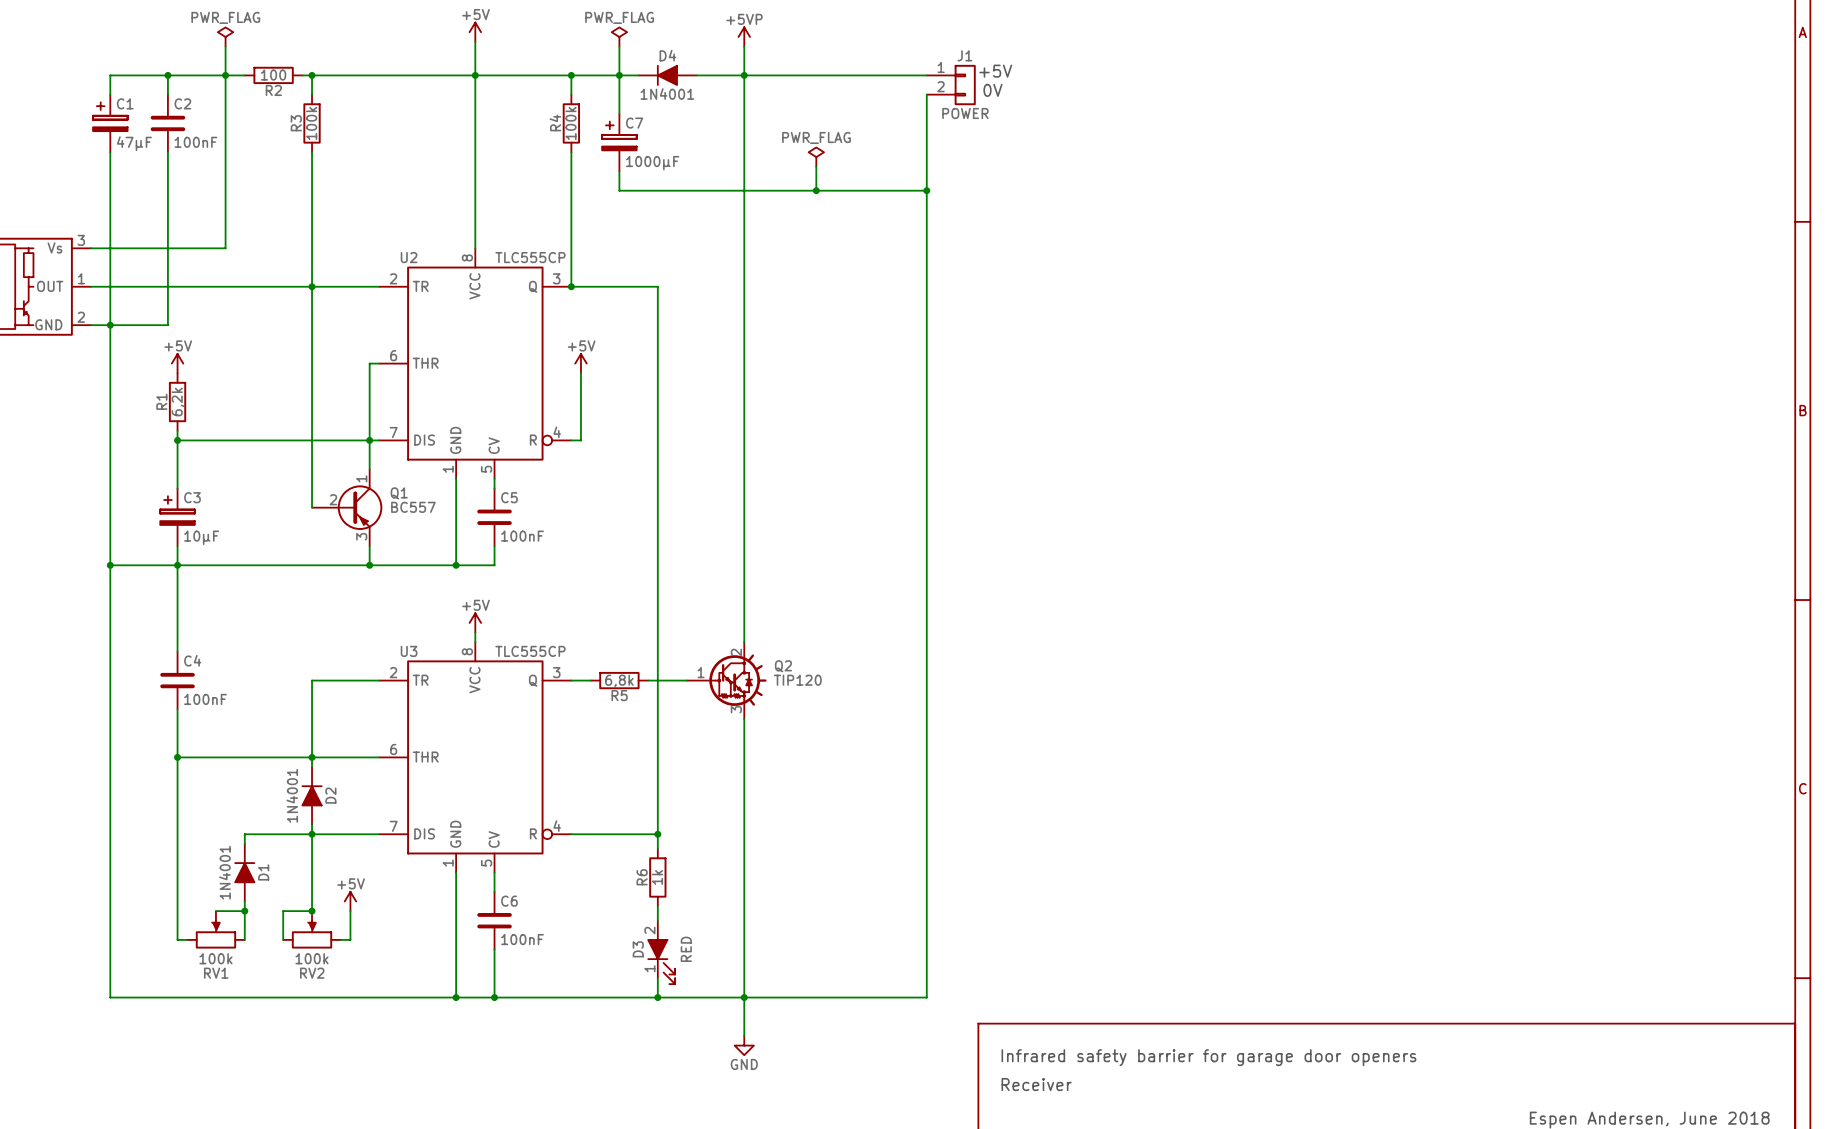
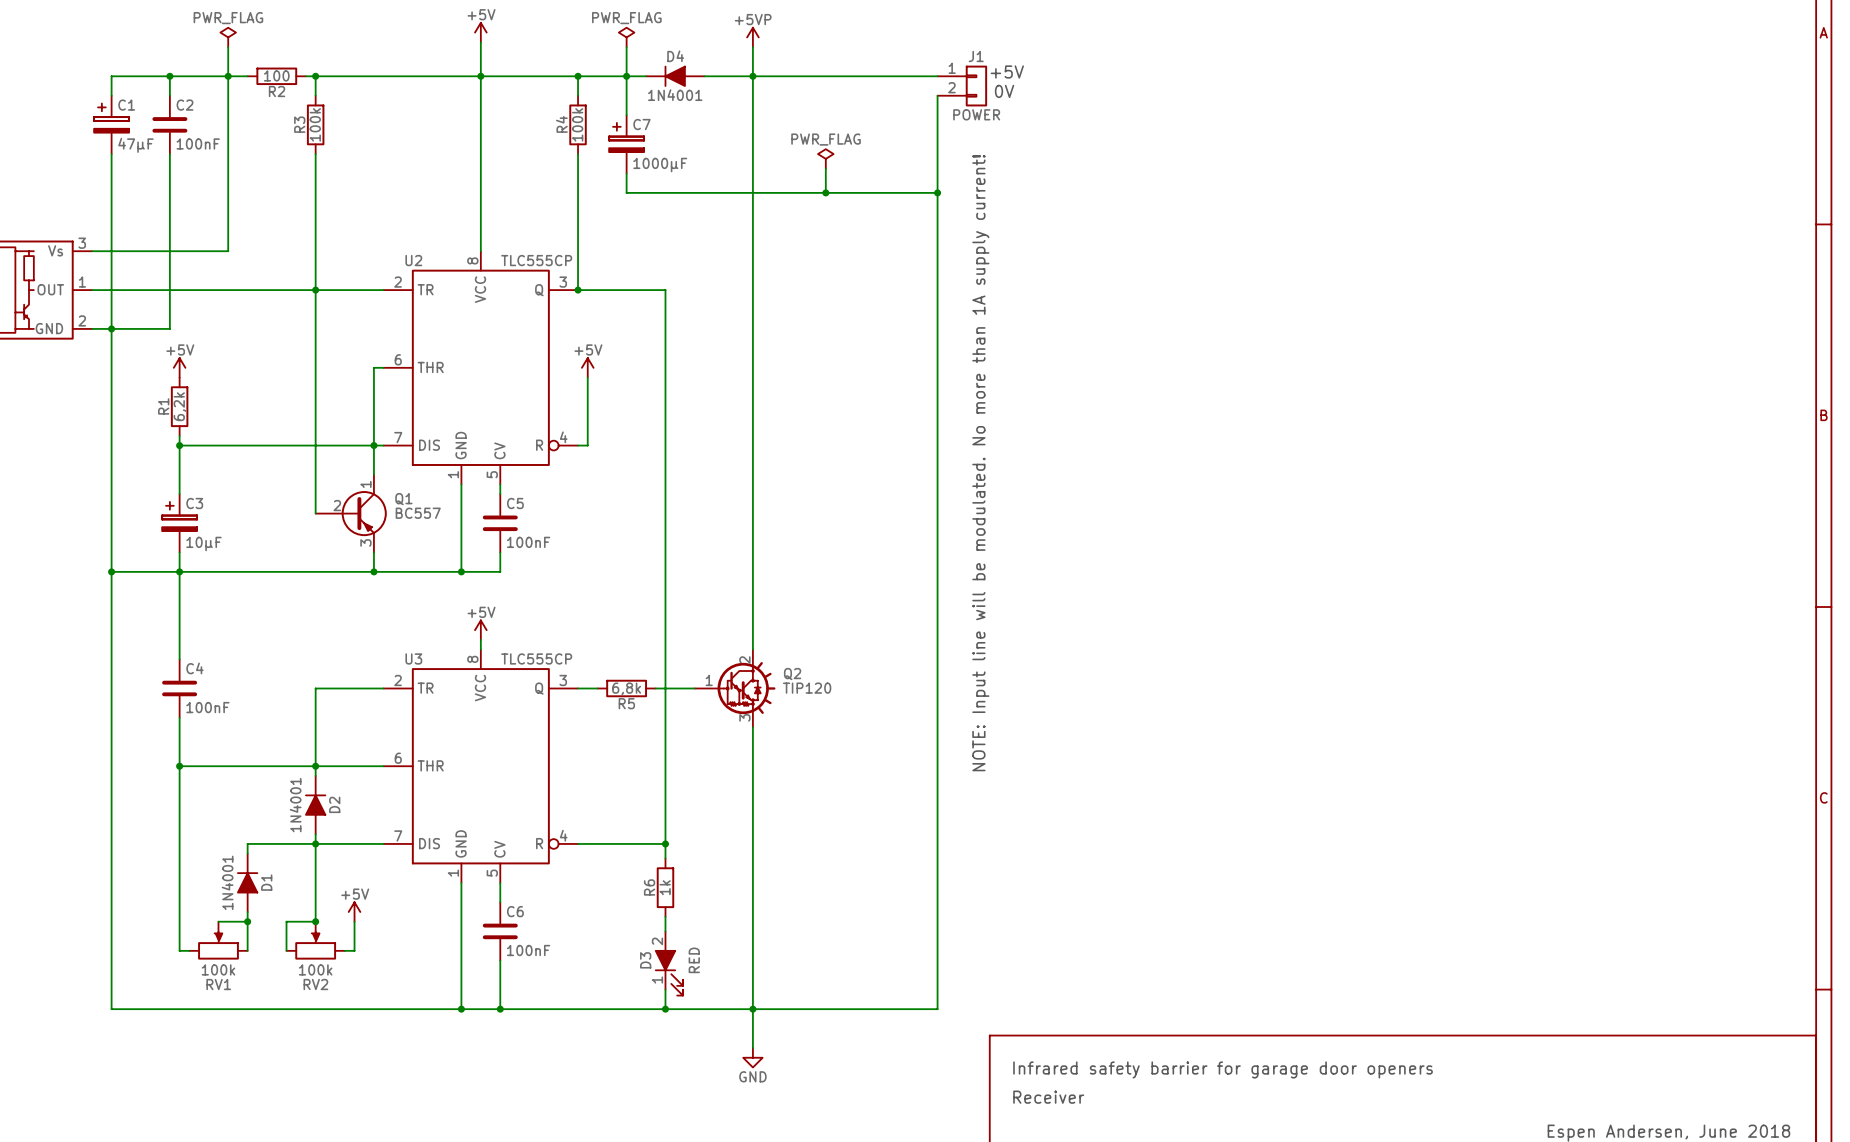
text: none -> NOTE: Input line will be modulated. No more than 1A supply current! (980, 463)

